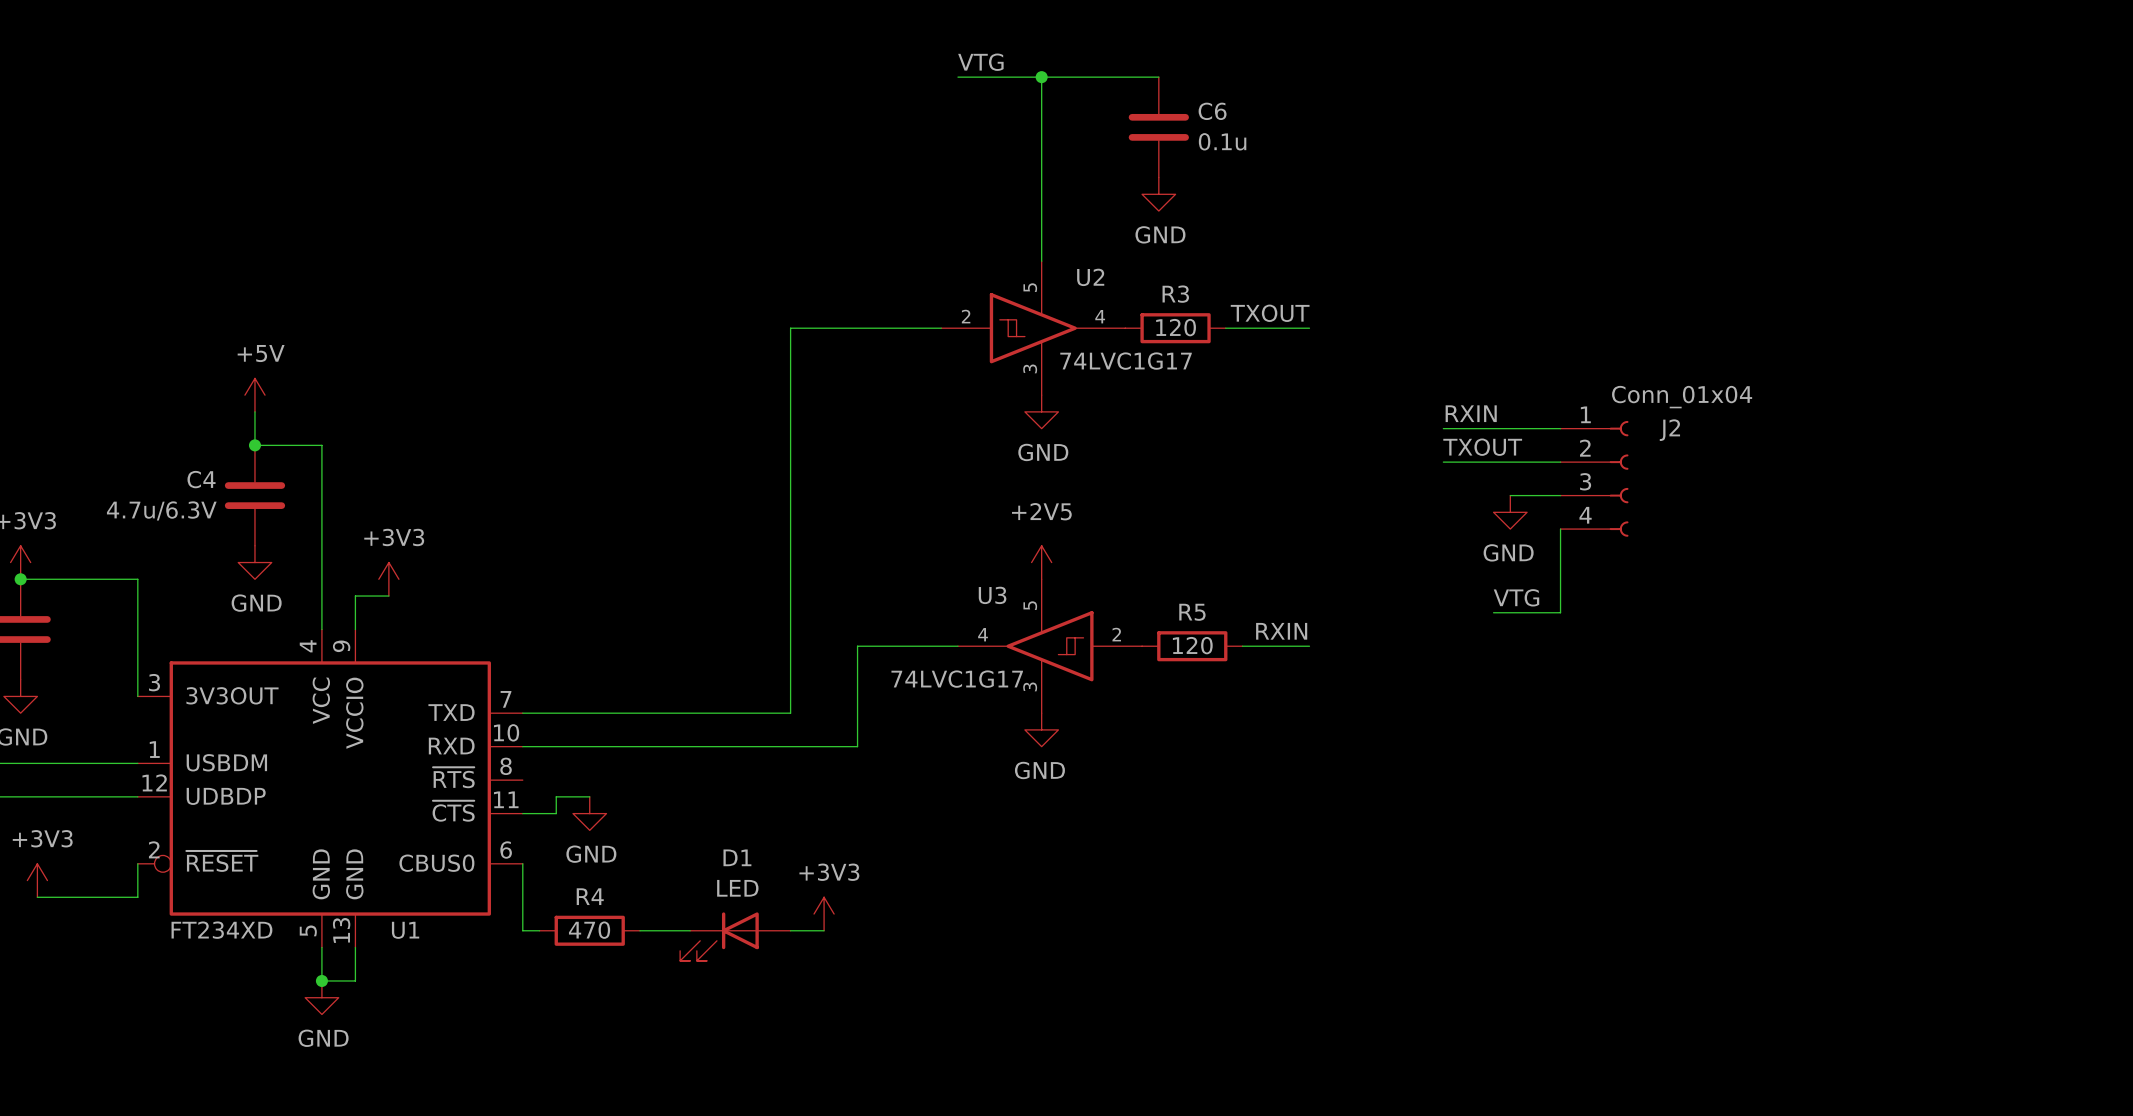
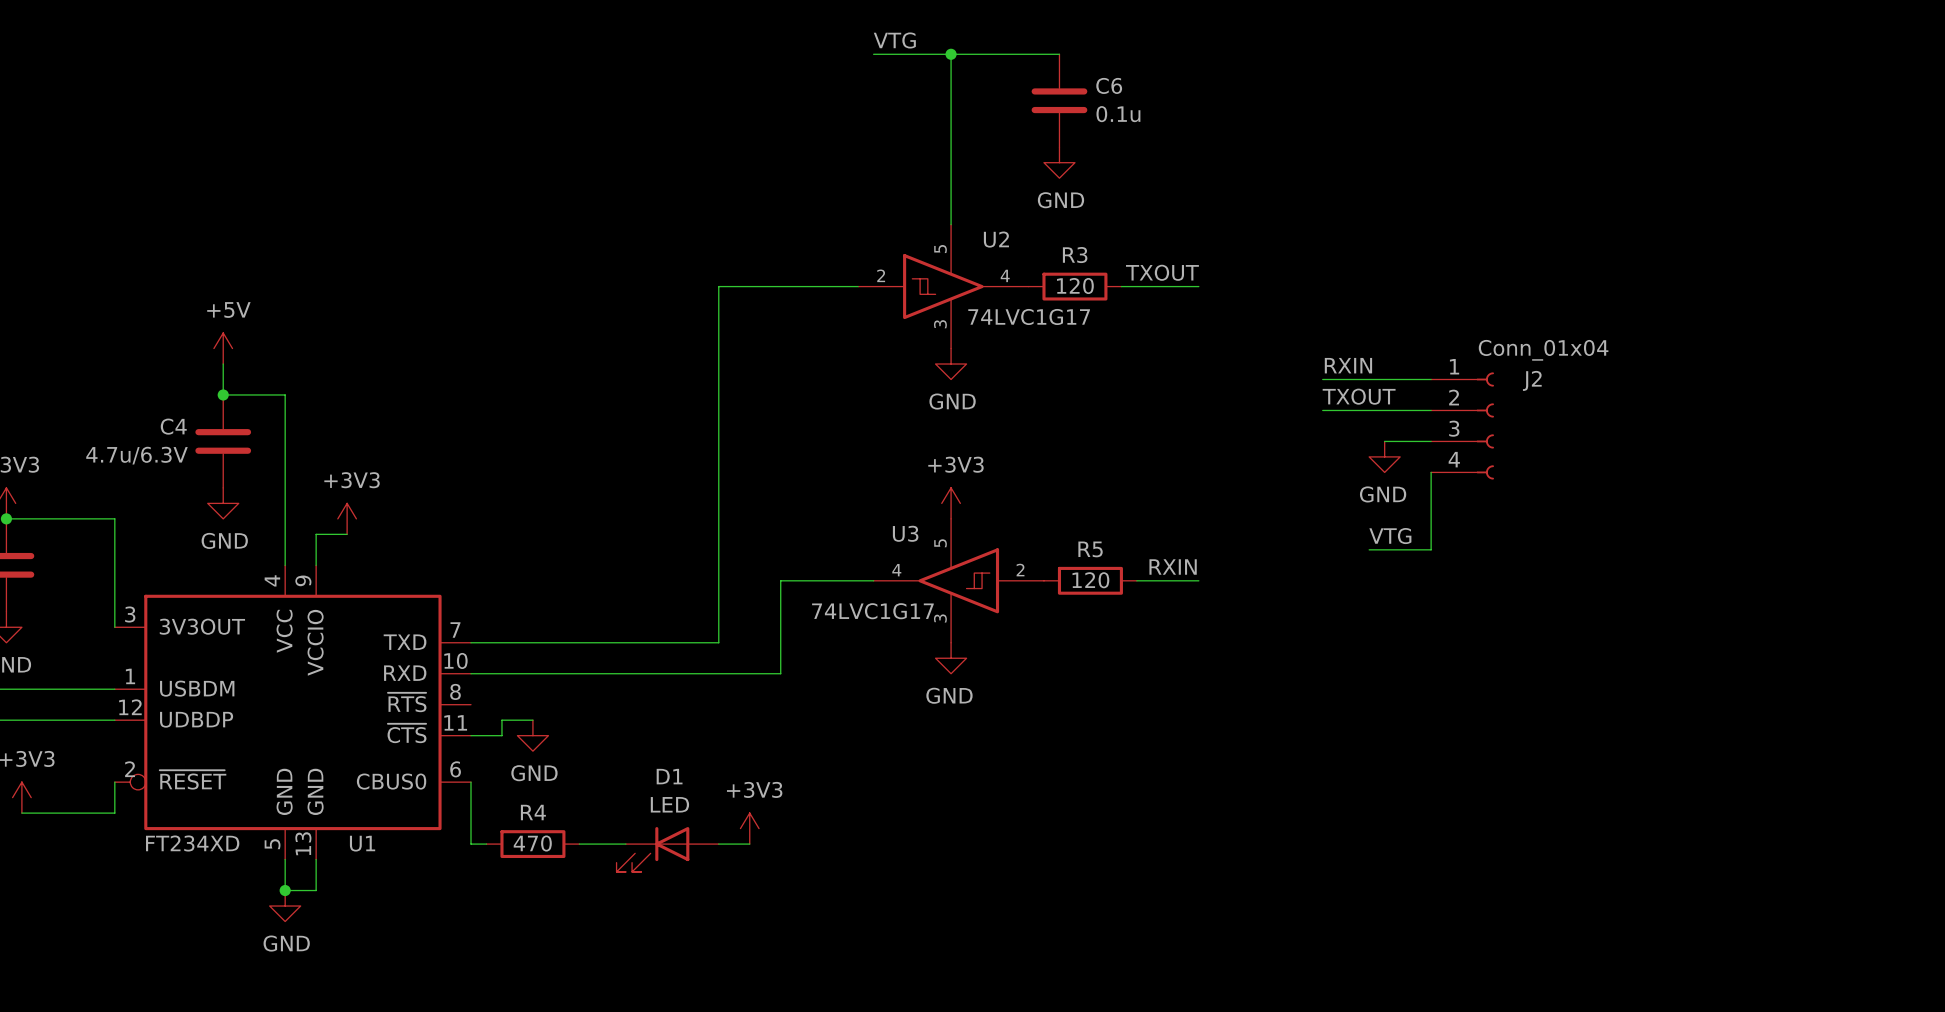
power symbol: +2V5 (1041, 562) -> +3V3 (951, 503)

